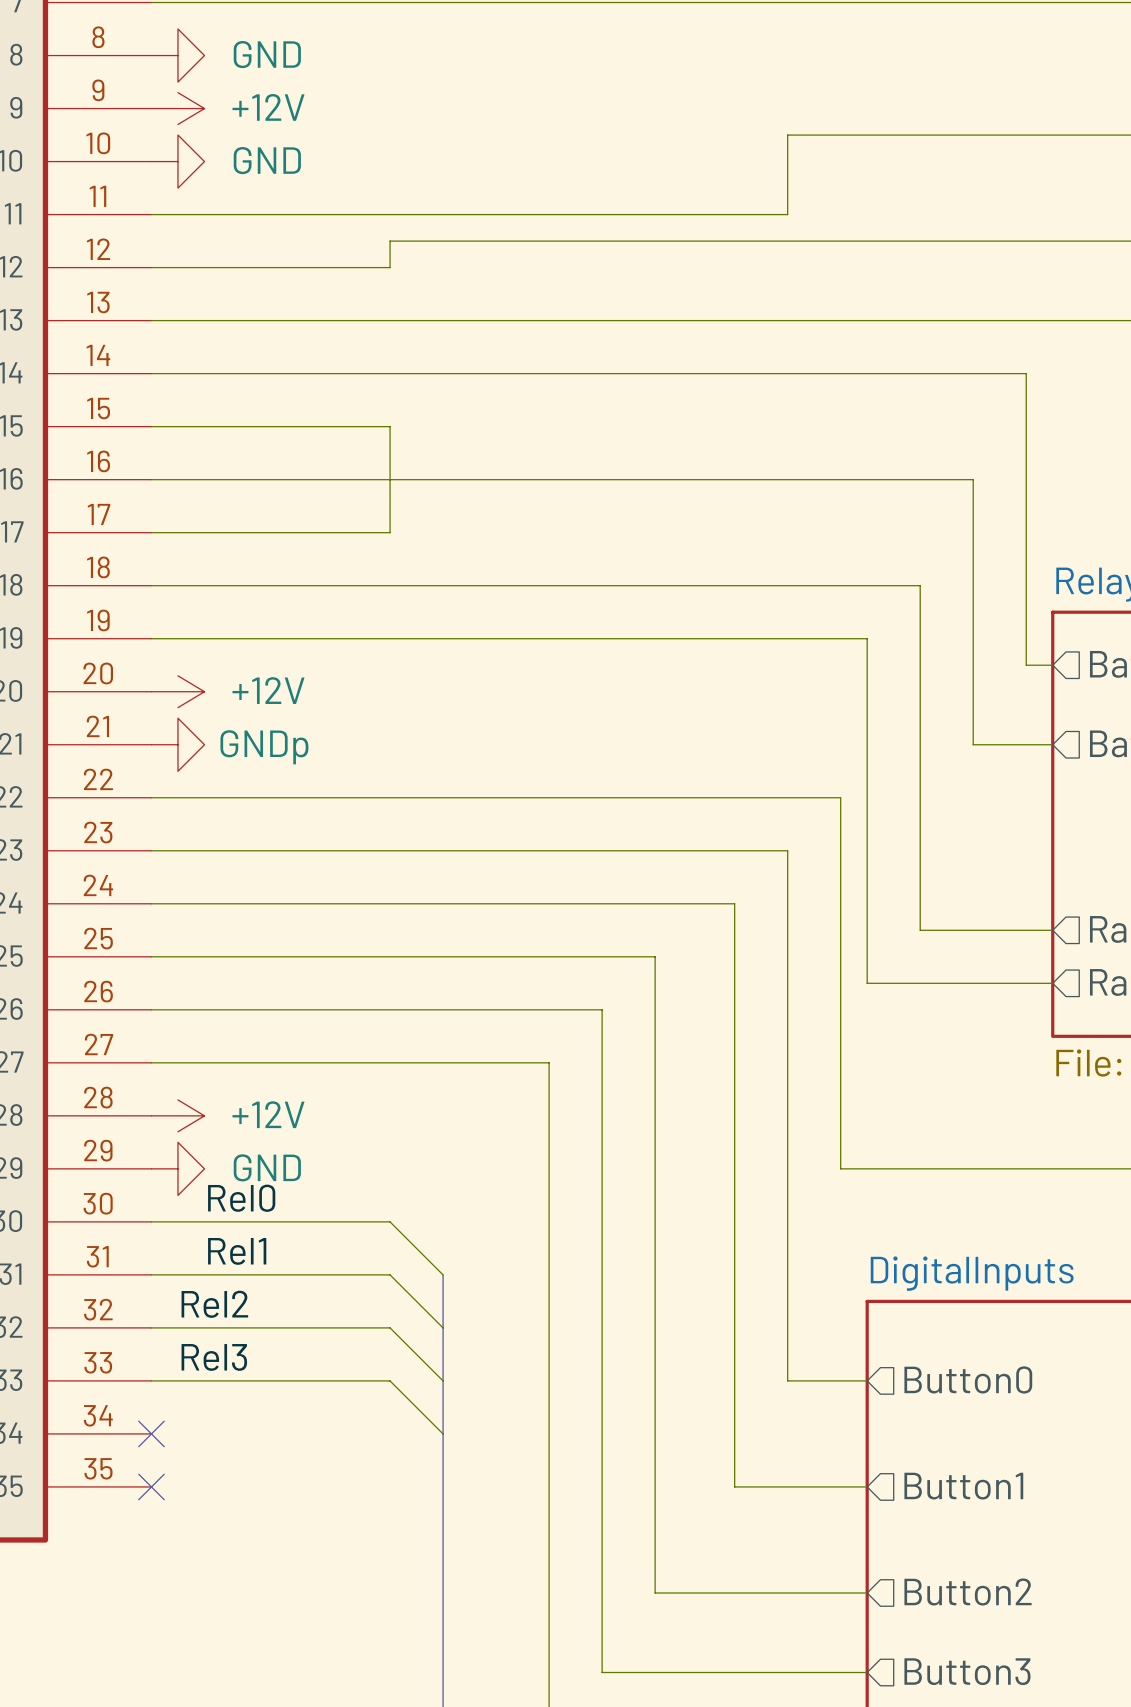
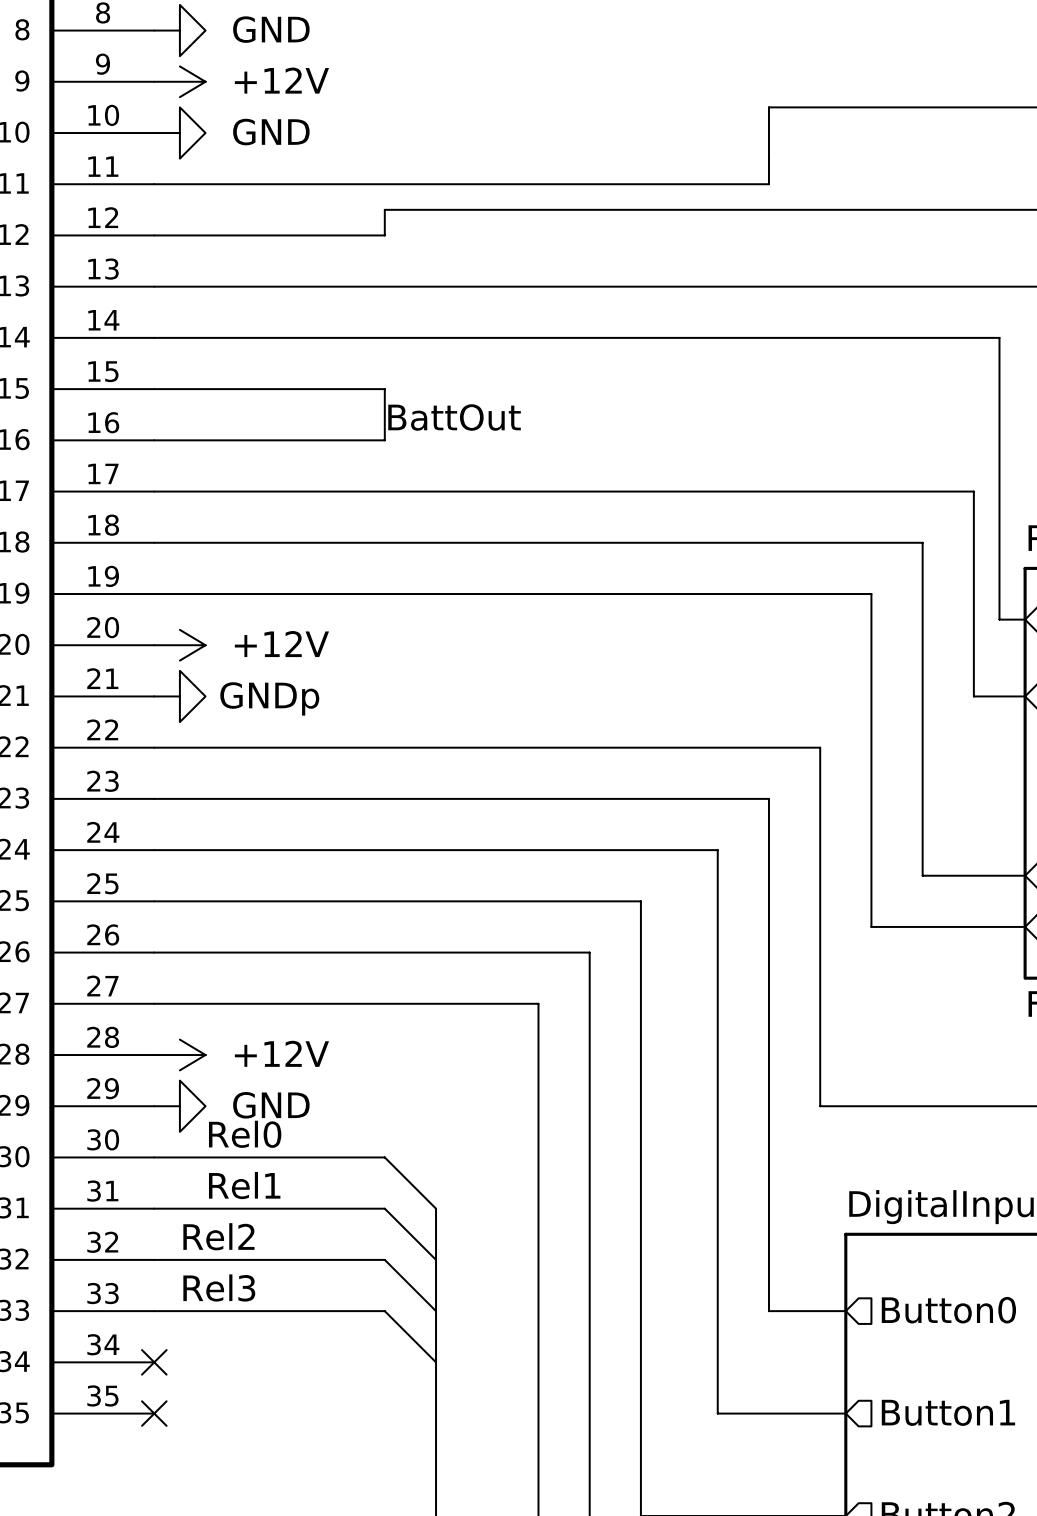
label: none -> BattOut (454, 417)
wire: (390, 532) (390, 479) (973, 479) (973, 744) (999, 744) -> (384, 491) (973, 491) (973, 696)
wire: (920, 585) (920, 930) (946, 930) -> (897, 542) (922, 542) (922, 875)
wire: (867, 638) (867, 983) (893, 983) -> (845, 594) (871, 594) (871, 926)

